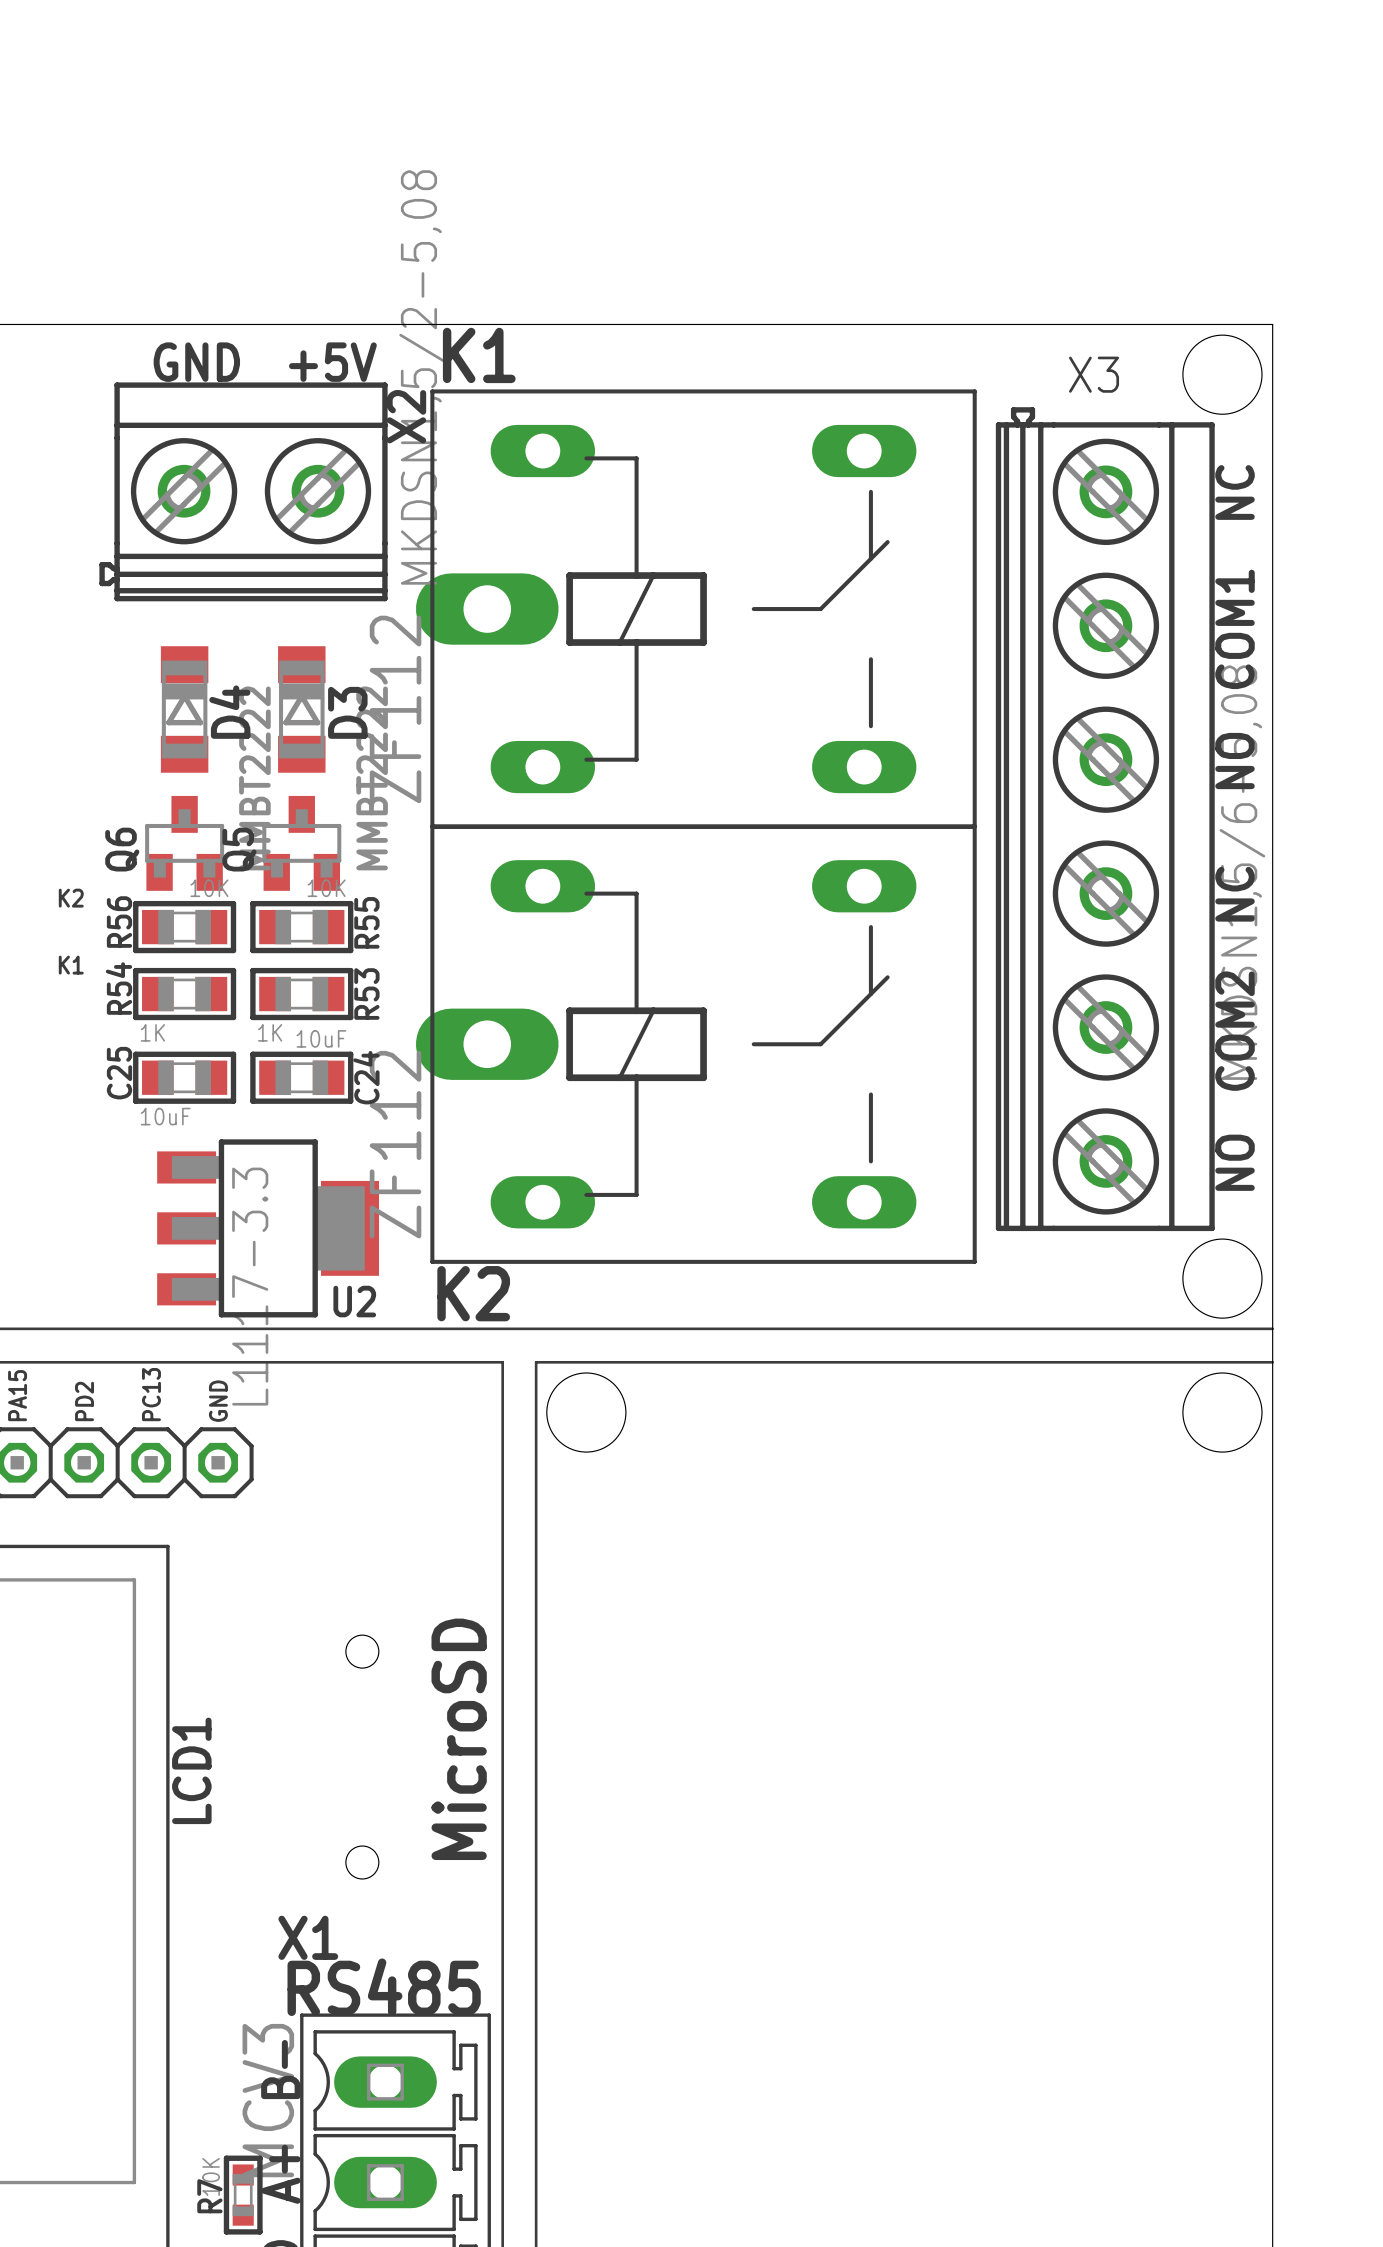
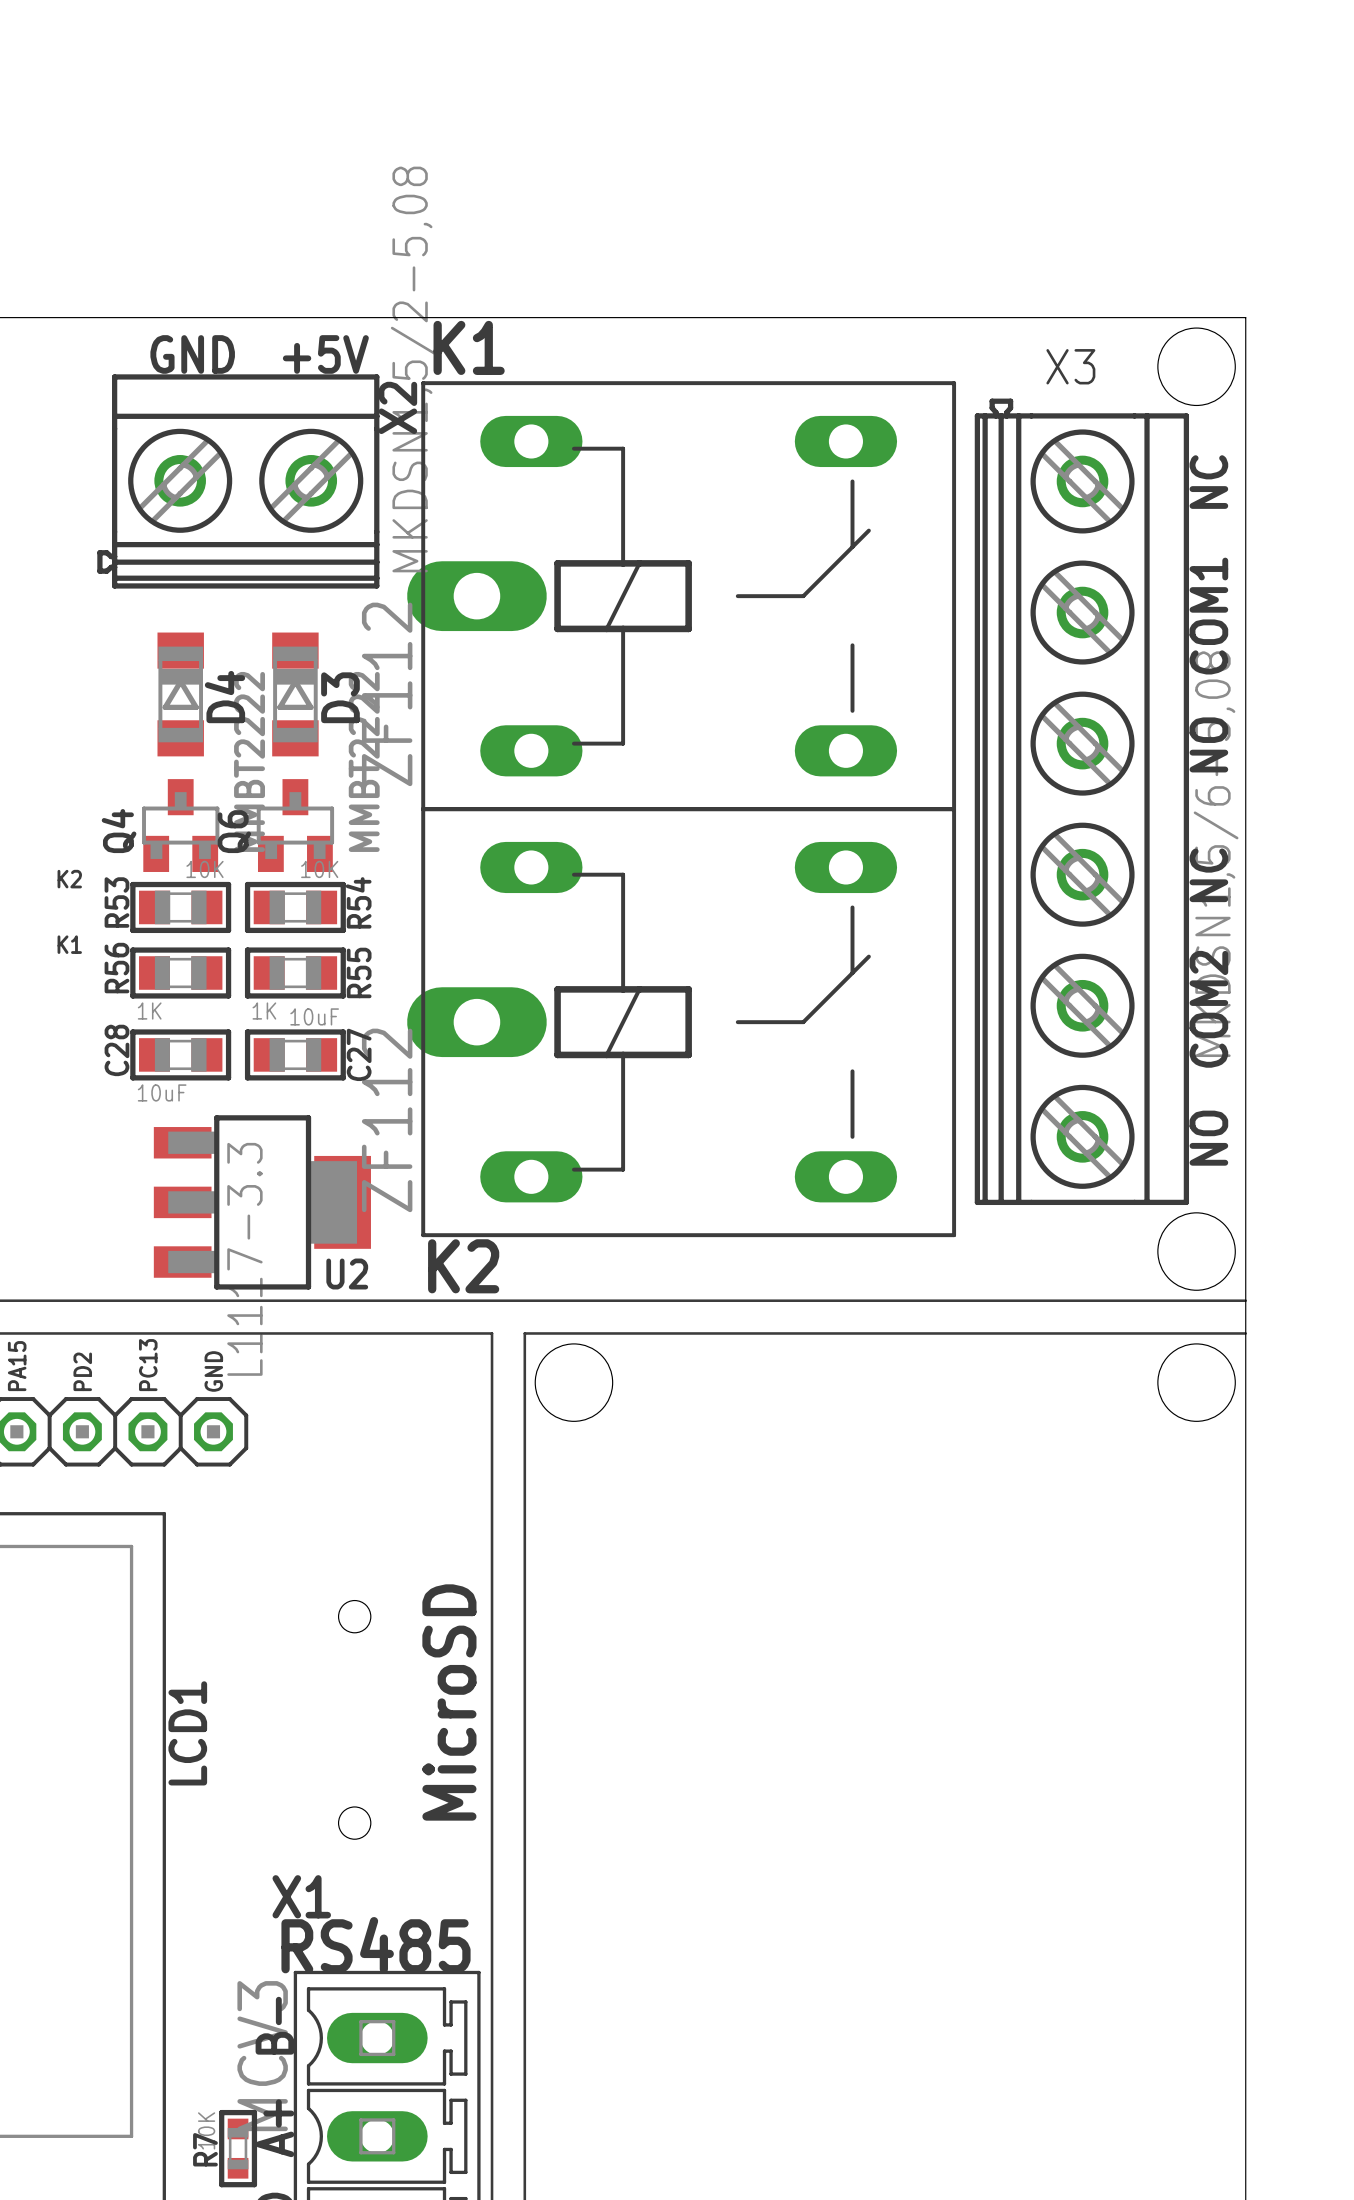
Q6 name: Q6 (122, 849) -> Q4 (119, 831)
Q5 name: Q5 (239, 849) -> Q6 (234, 831)
R56 name: R56 (119, 922) -> R53 (116, 902)
R55 name: R55 (366, 922) -> R54 (358, 902)
R54 name: R54 (118, 988) -> R56 (116, 968)
R53 name: R53 (366, 994) -> R55 (359, 972)
C25 name: C25 (119, 1073) -> C28 (116, 1050)
C24 name: C24 (366, 1077) -> C27 (359, 1054)

